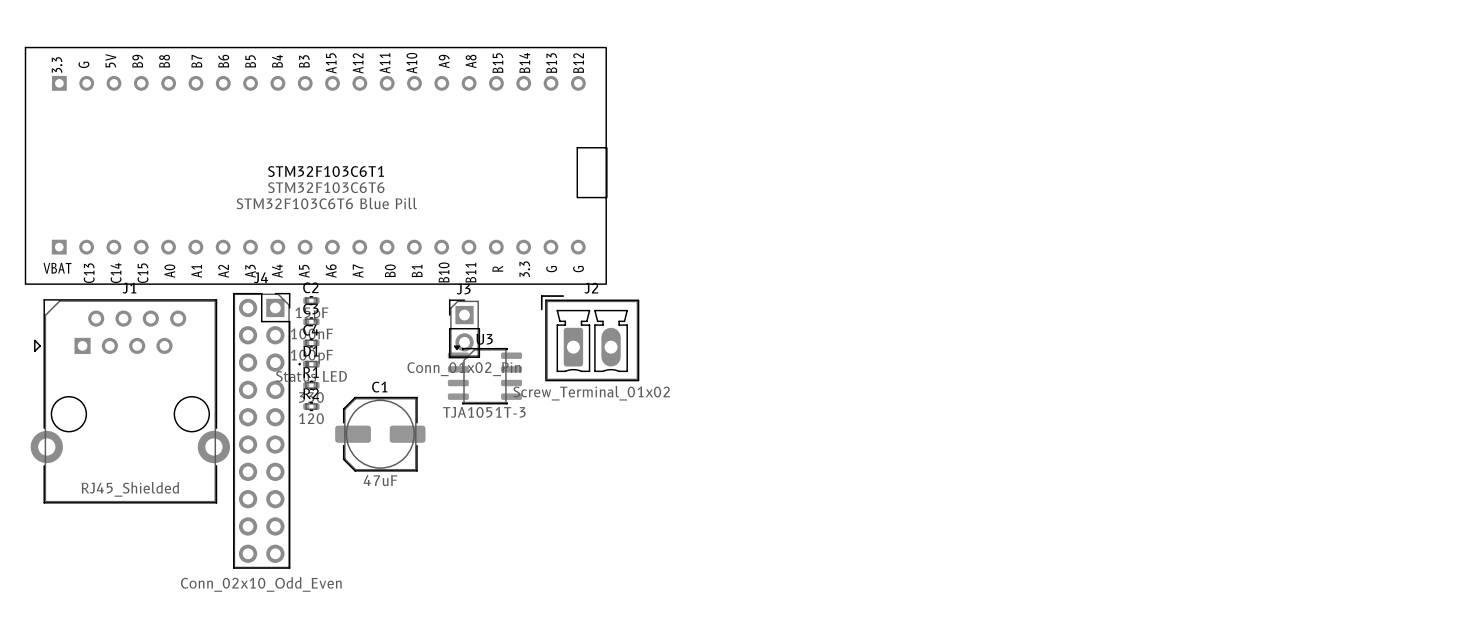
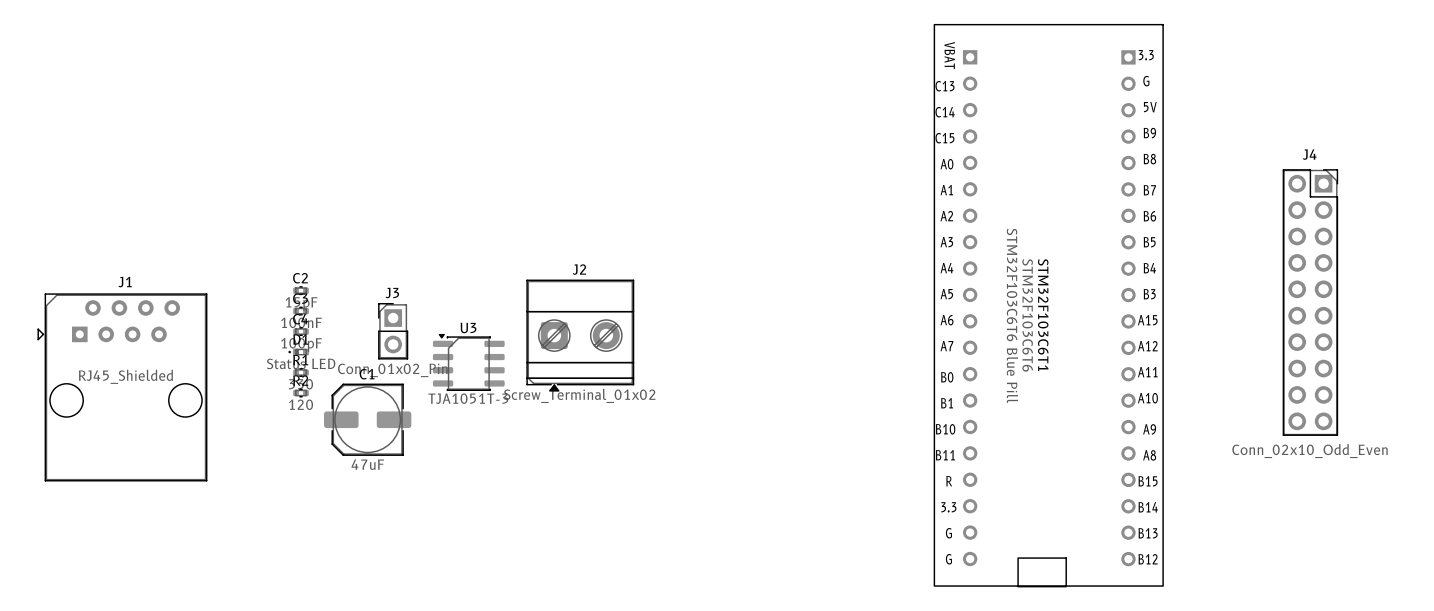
STM32F103C6T1 rotation: 0° (316, 165) -> 90° clockwise (1048, 305)
STM32F103C6T1 position: (316, 165) -> (1048, 305)
J2 footprint: [541, 295, 640, 382] -> [526, 279, 635, 392]
J1 footprint: [30, 299, 231, 504] -> [37, 293, 208, 482]
J3 position: (464, 328) -> (393, 331)
J4 position: (261, 430) -> (1310, 302)
J1 value position: RJ45_Shielded (130, 489) -> RJ45_Shielded (125, 376)

